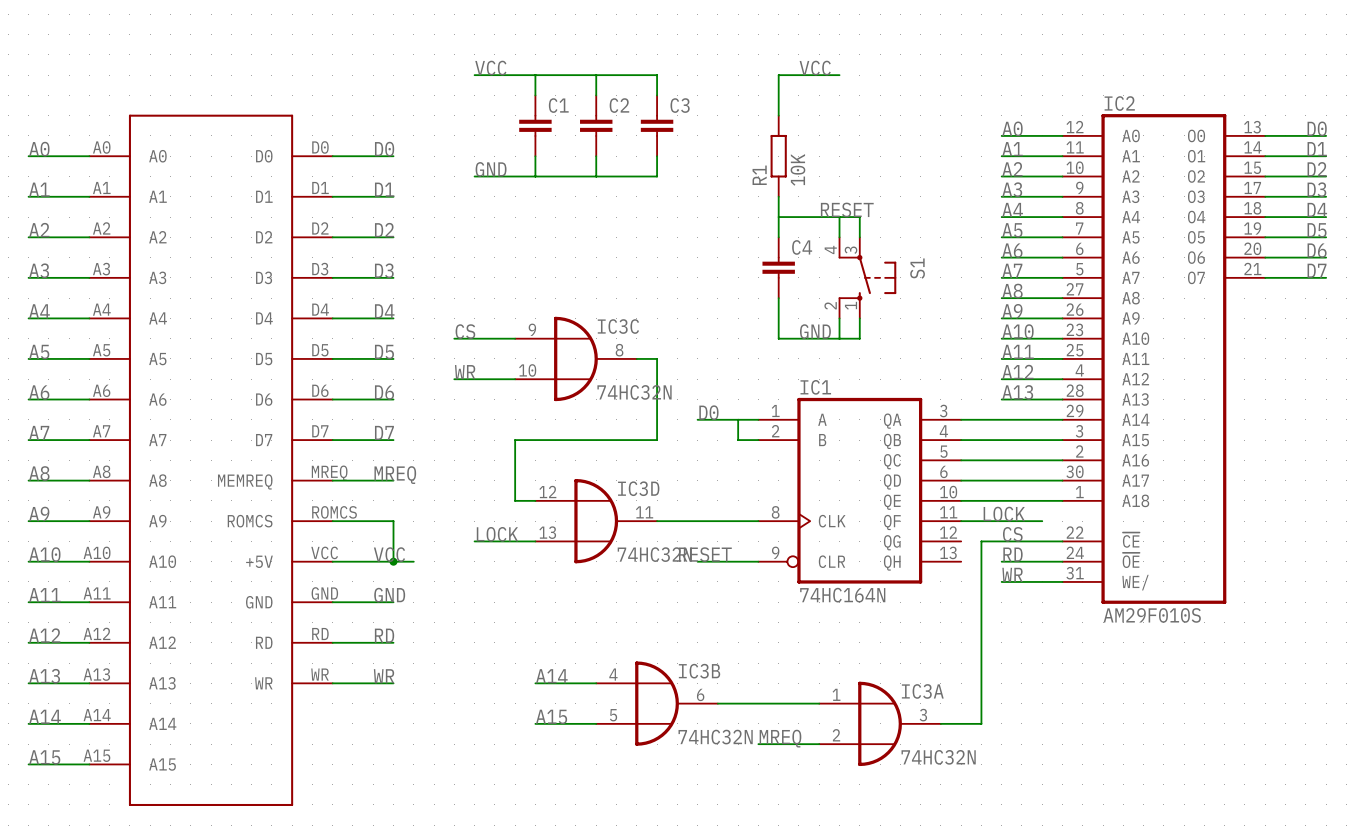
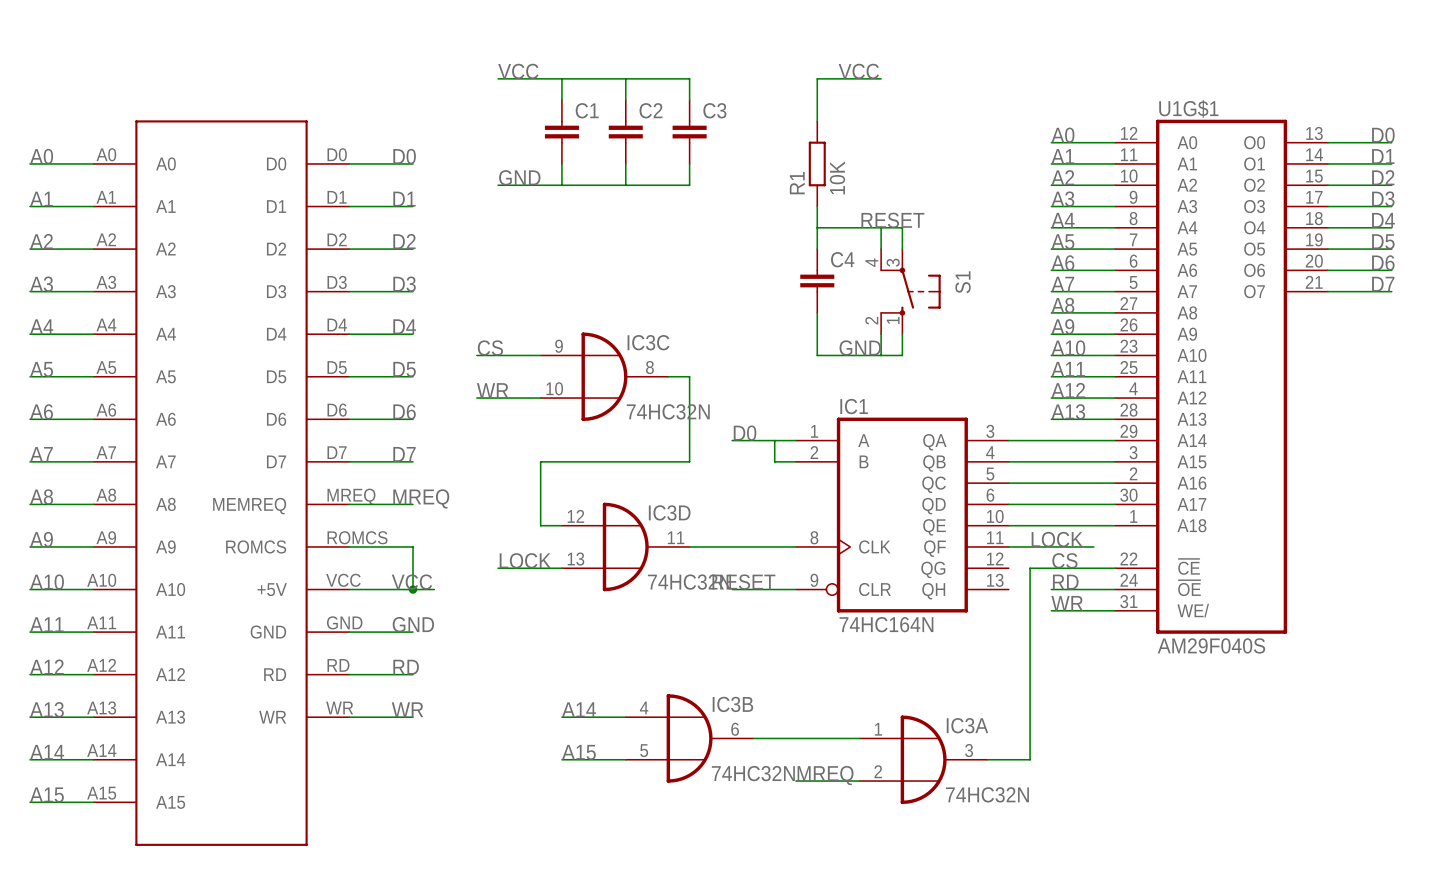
IC2 name: IC2 (1119, 103) -> U1G$1 (1188, 108)
IC2 value: AM29F010S (1152, 615) -> AM29F040S (1211, 645)

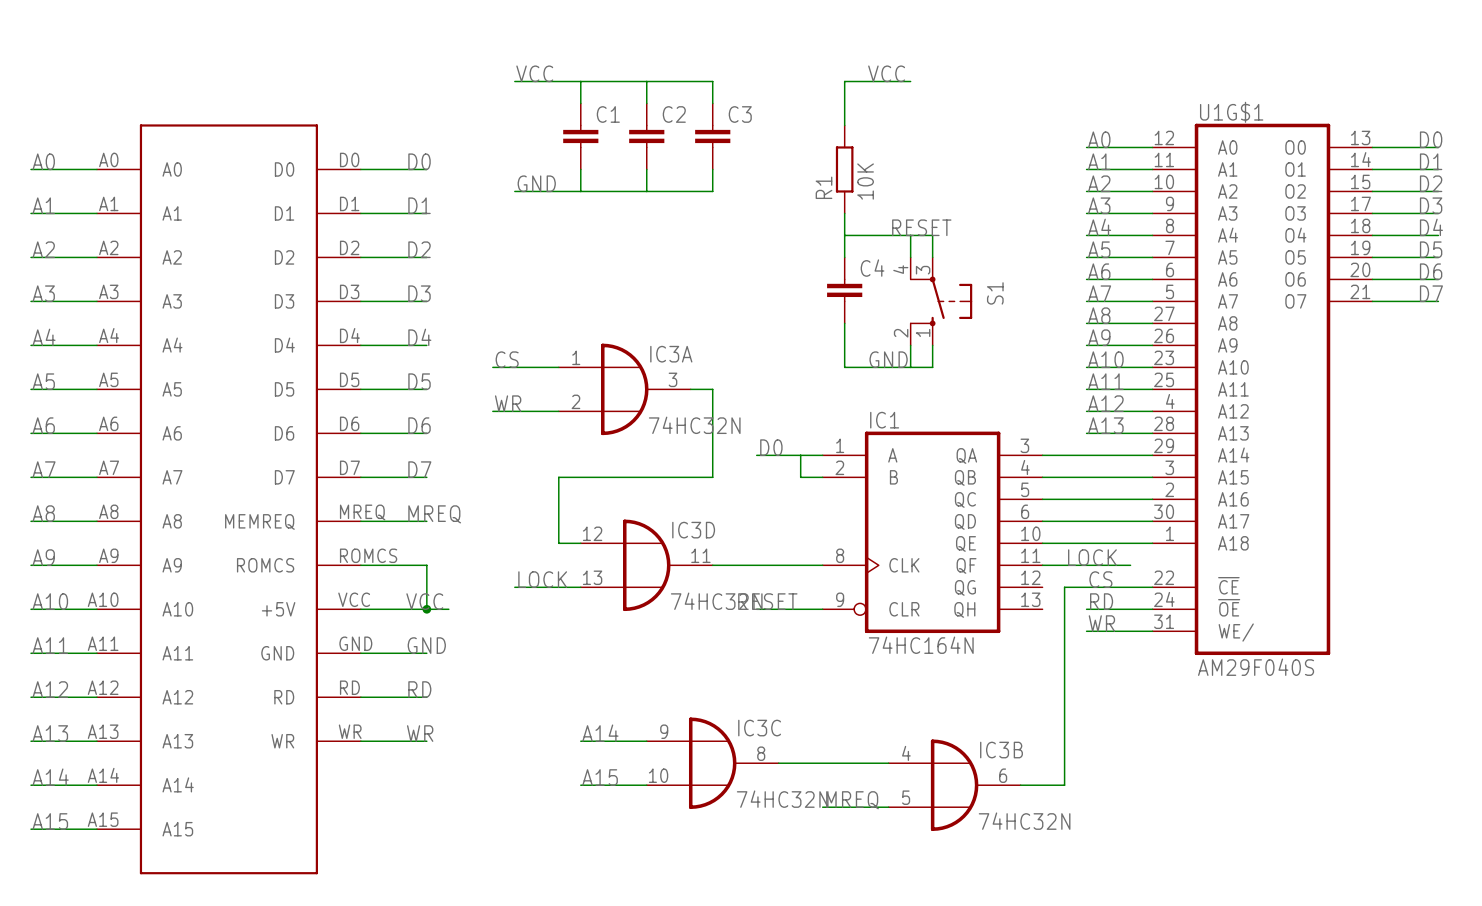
IC3C position: (604, 376) -> (712, 763)
IC3B position: (689, 738) -> (954, 785)
IC3A position: (923, 759) -> (624, 389)

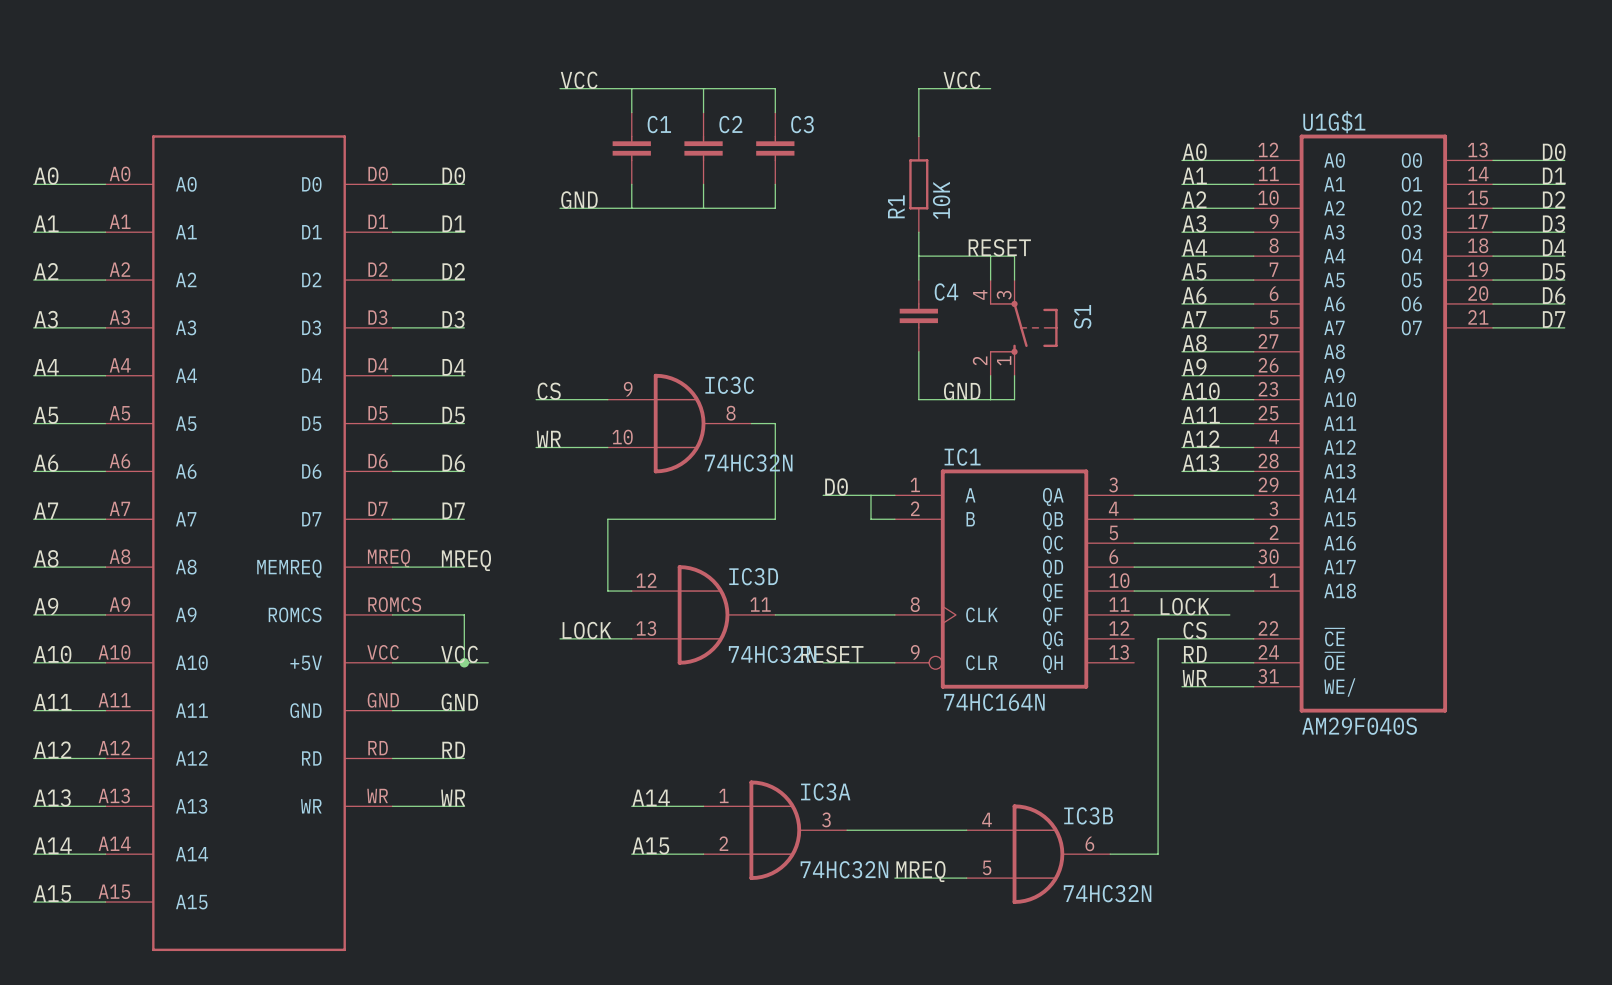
IC3A position: (624, 389) -> (775, 830)
IC3C position: (712, 763) -> (679, 423)

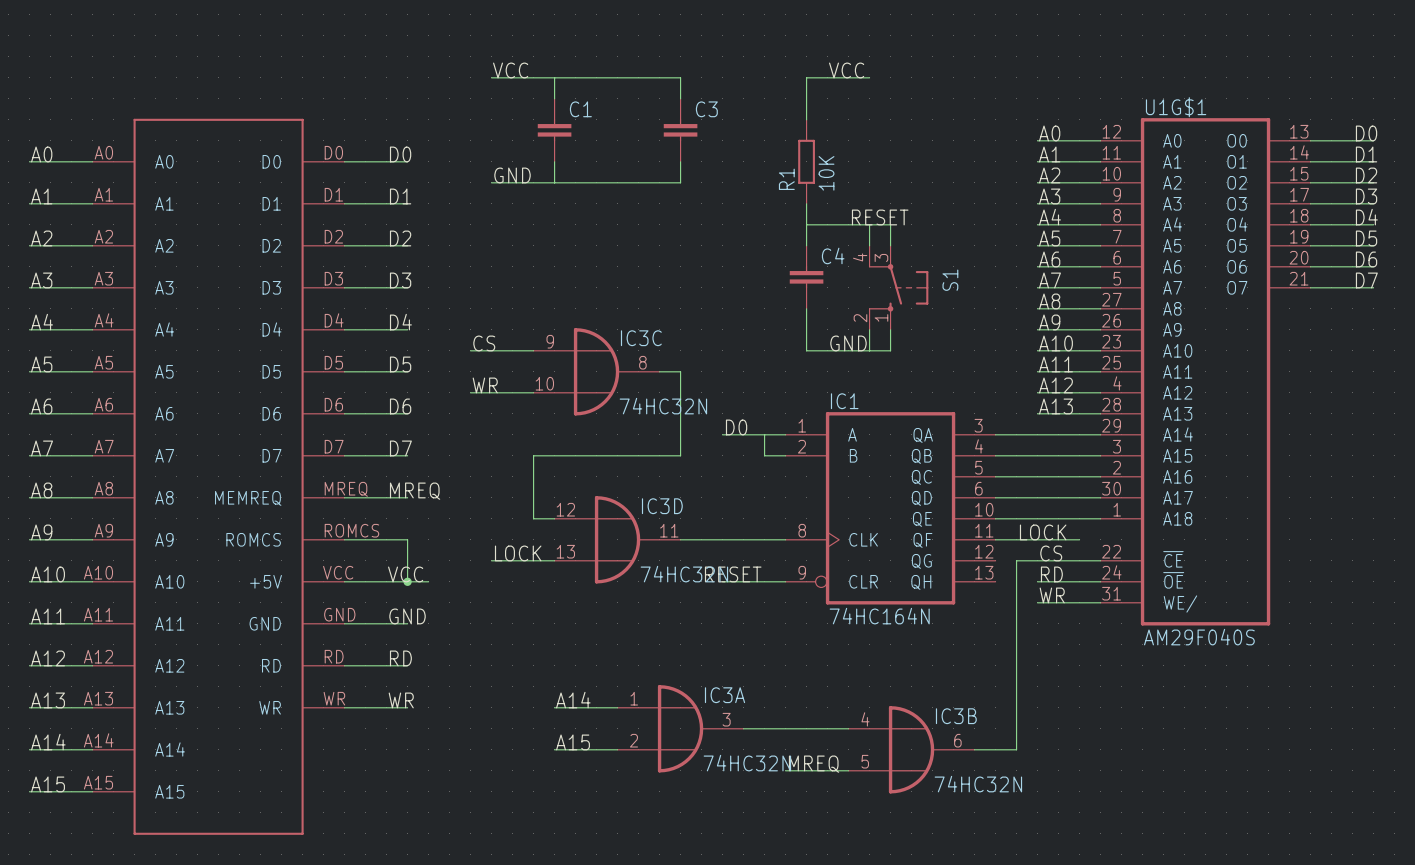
wire: (703, 88) (703, 112) -> none
C2: (703, 148) -> none
wire: (703, 184) (703, 208) -> none

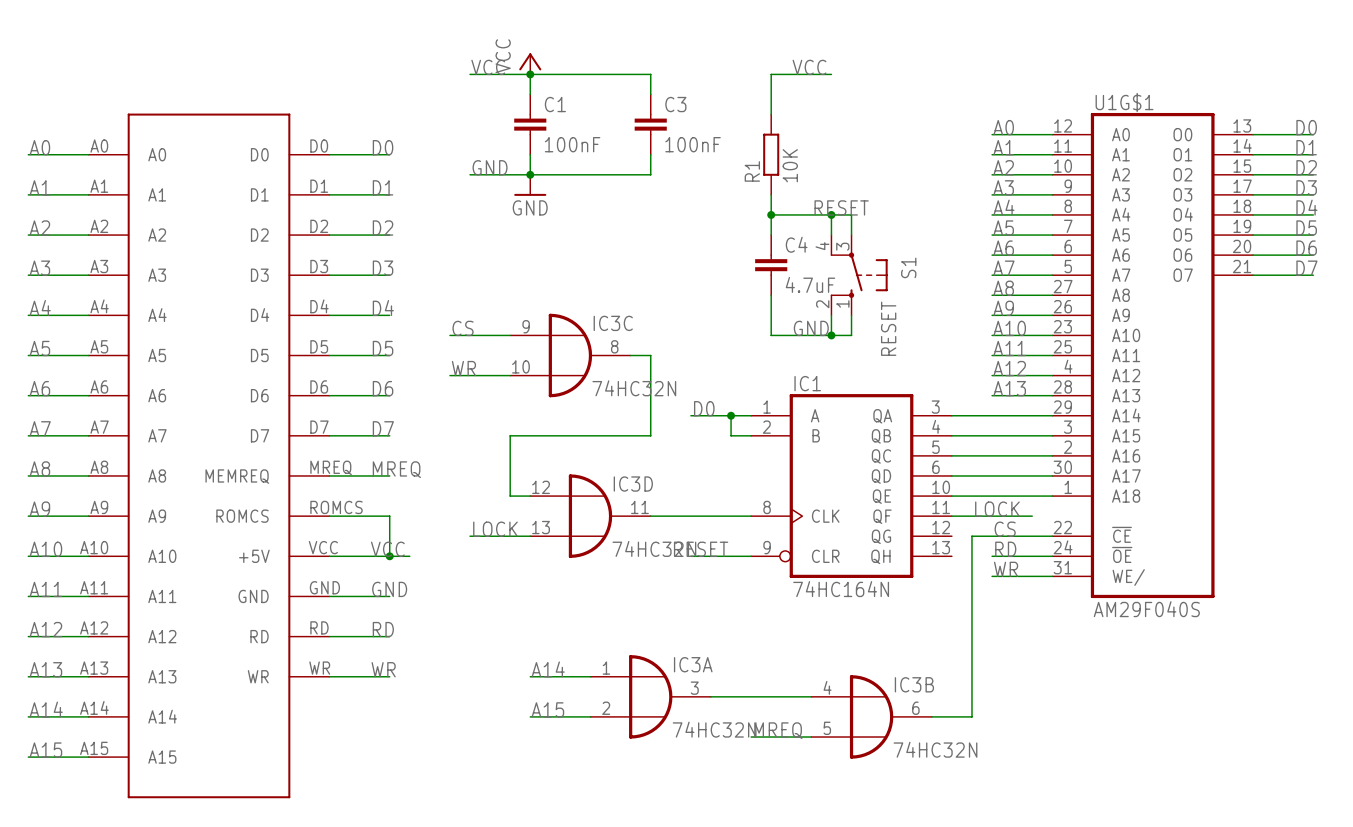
power symbol: none -> VCC (530, 63)
junction: none -> (530, 74)
C1 value: none -> 100nF (572, 144)
C3 value: none -> 100nF (693, 144)
junction: none -> (530, 174)
power symbol: none -> GND (530, 185)
junction: none -> (771, 214)
junction: none -> (831, 214)
C4 value: none -> 4.7uF (810, 284)
S1 value: none -> RESET (888, 328)
junction: none -> (831, 335)
junction: none -> (731, 415)

